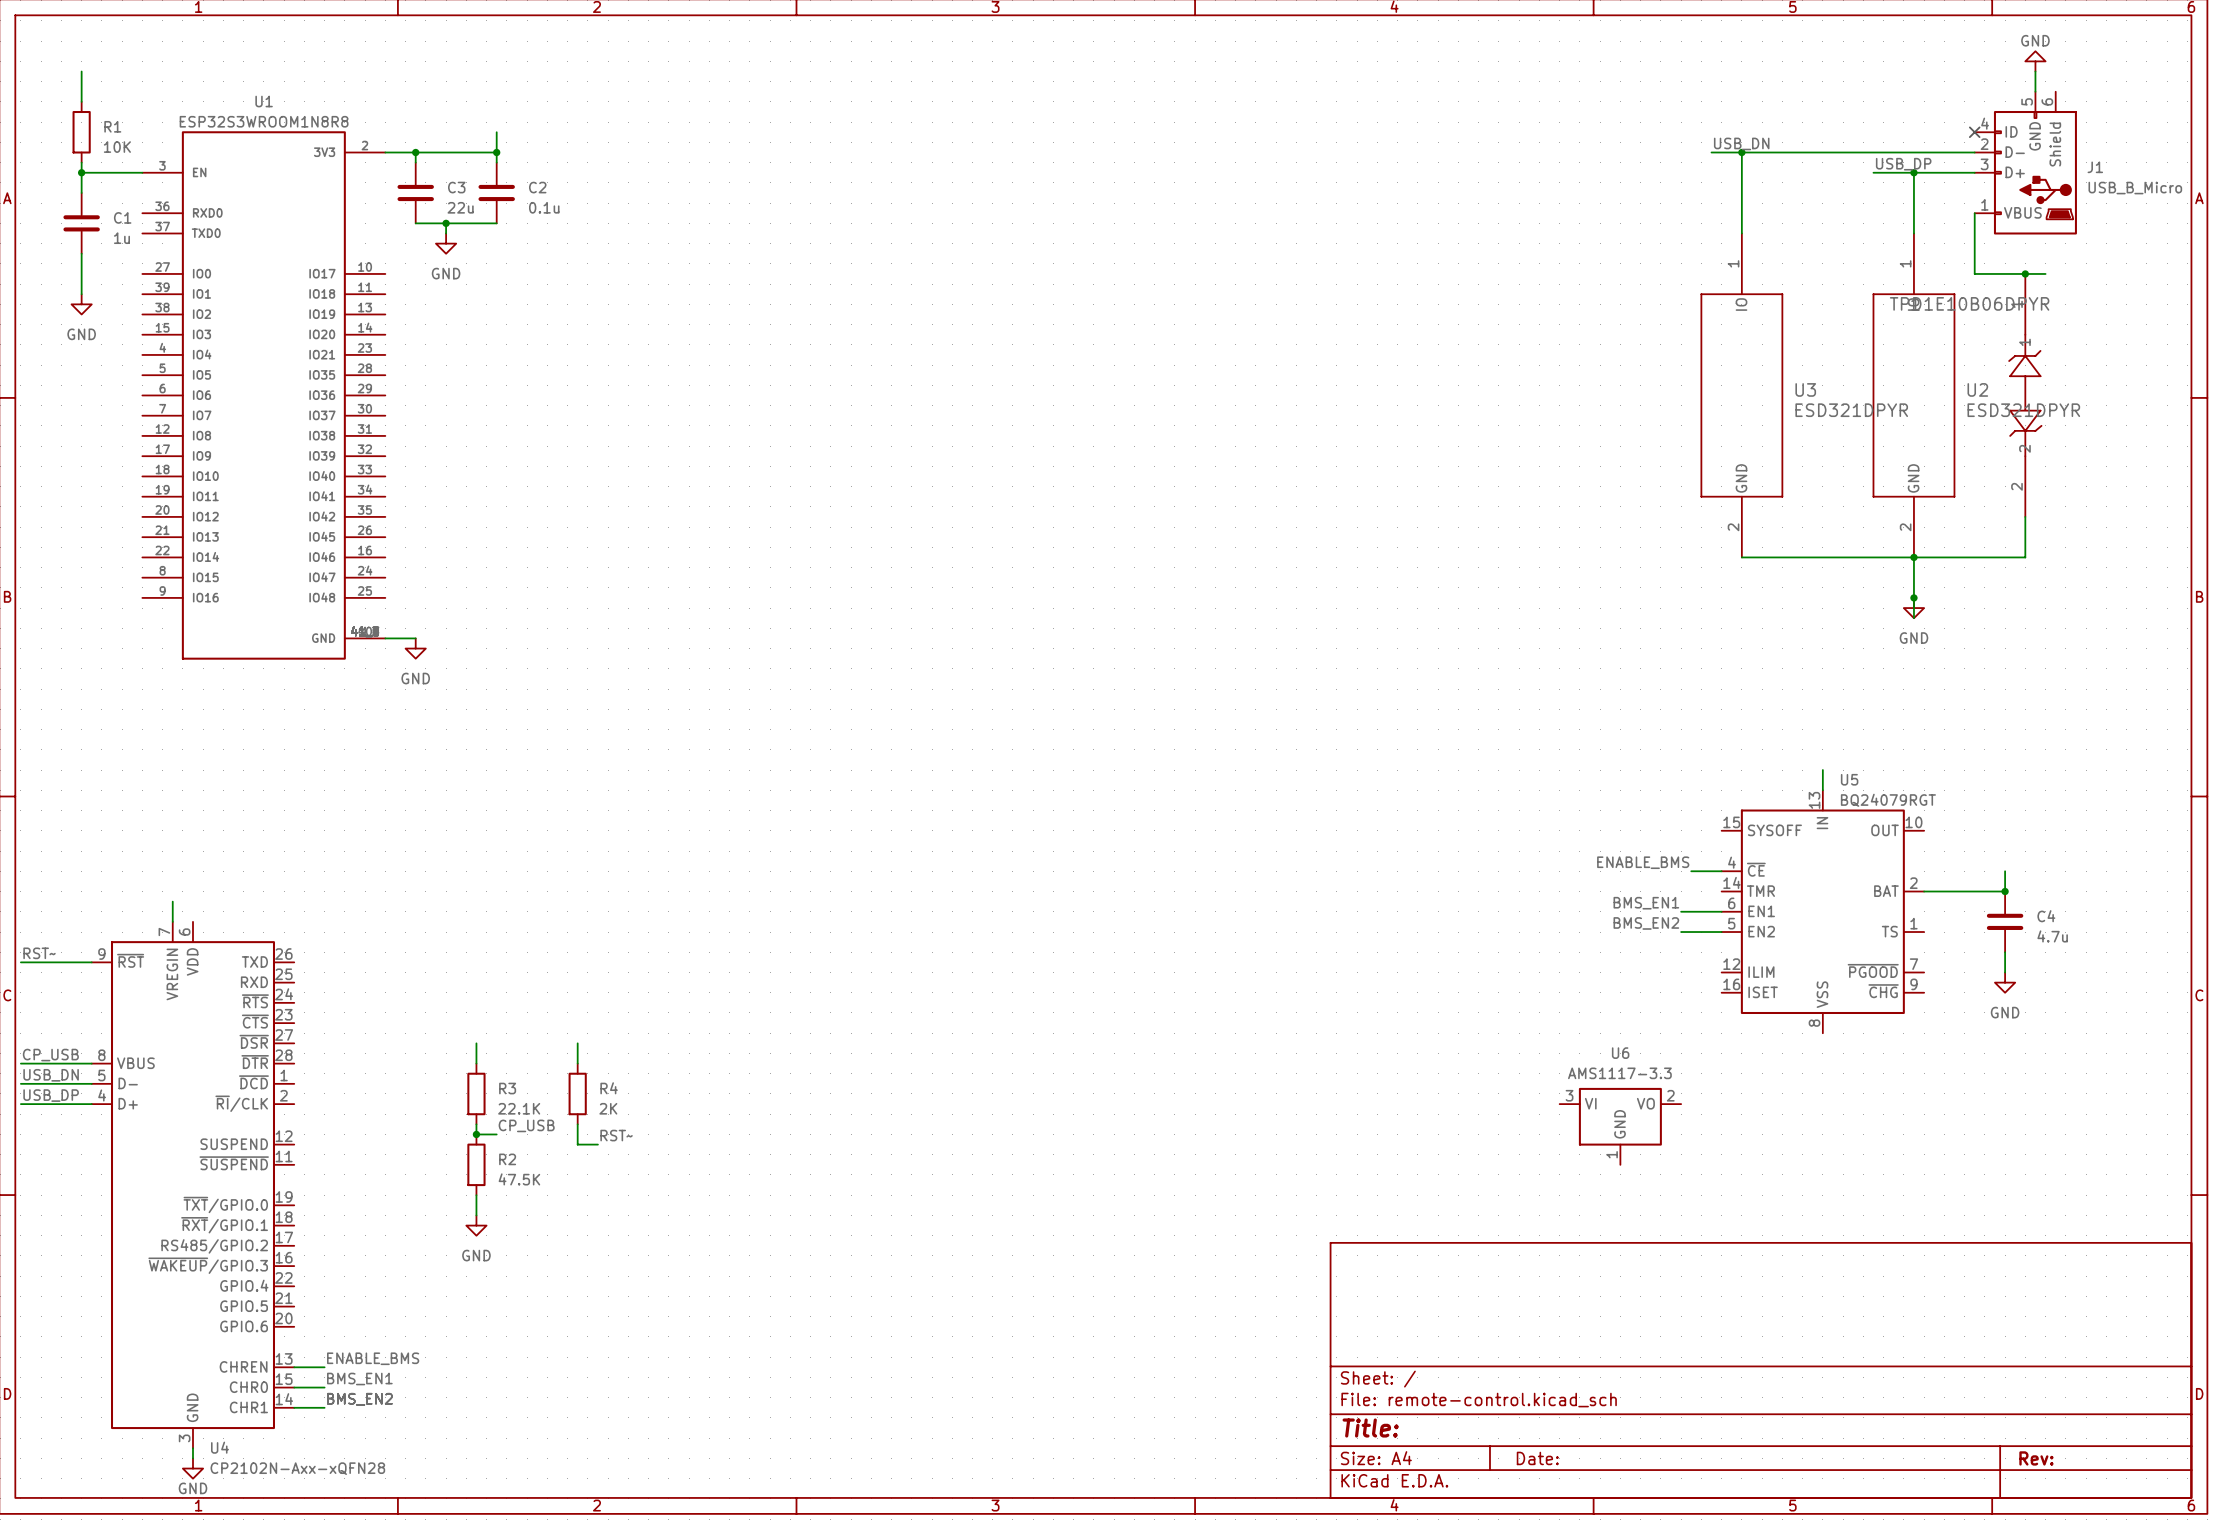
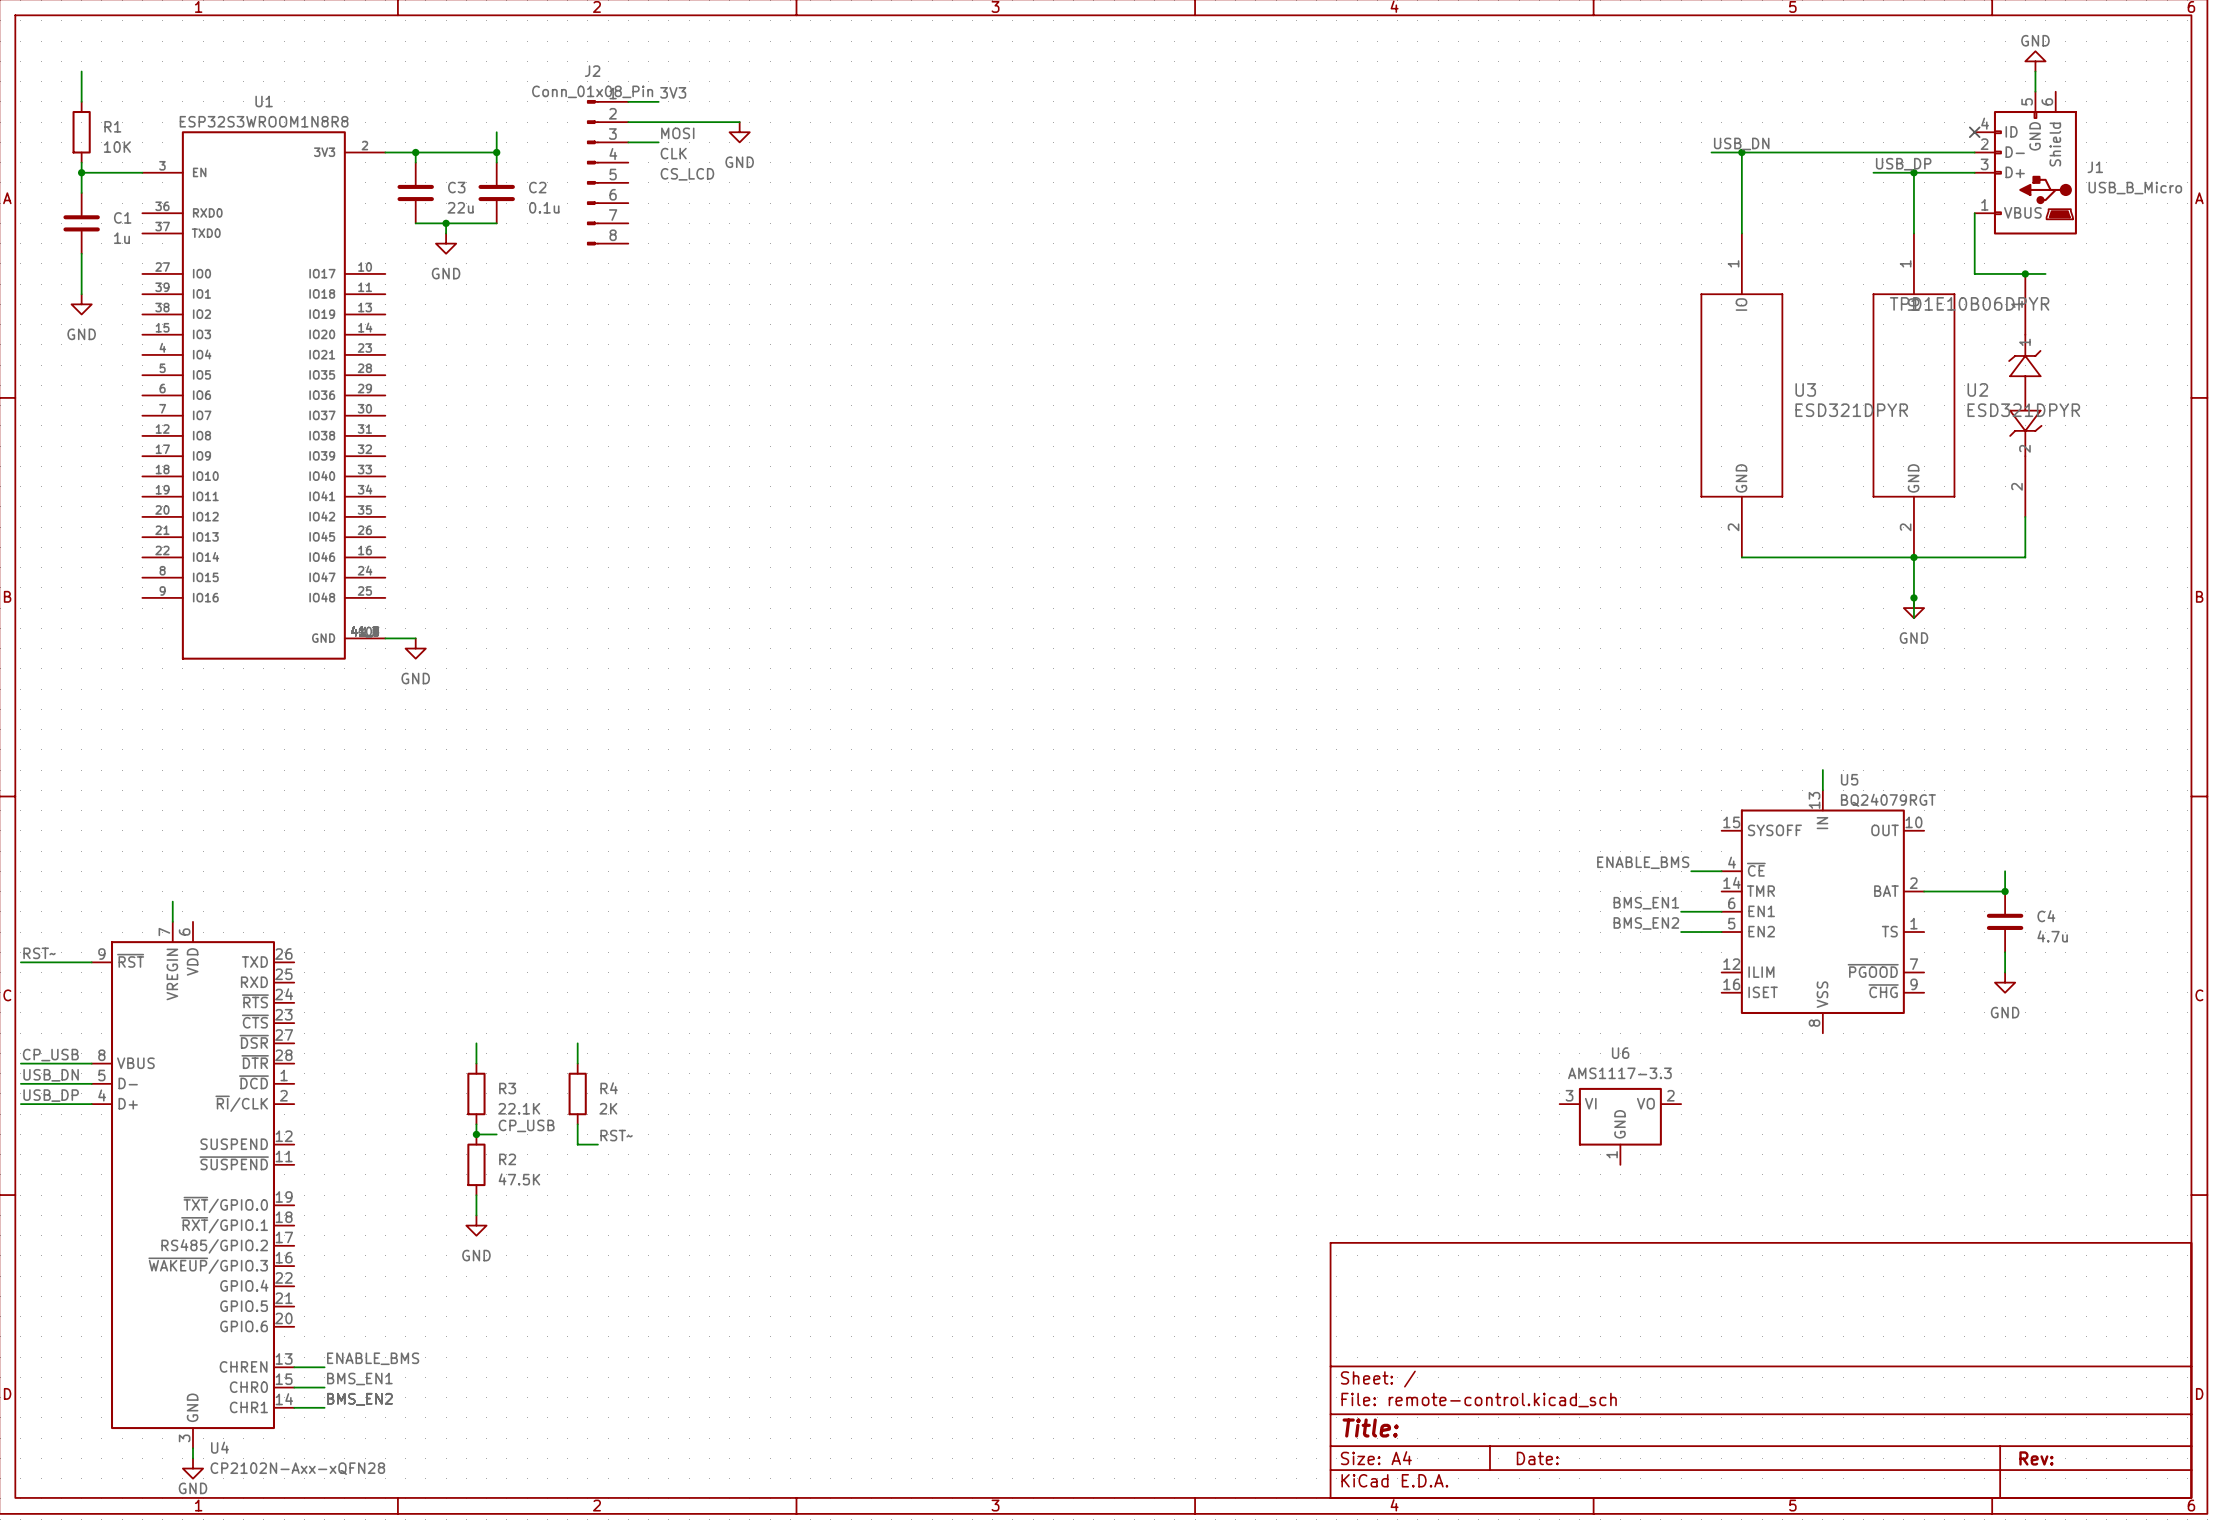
label: none -> 3V3 (673, 92)
wire: none -> (628, 101) (658, 101)
wire: none -> (628, 122) (739, 122)
power symbol: none -> GND (739, 132)
label: none -> MOSI (677, 133)
wire: none -> (628, 142) (658, 142)
label: none -> CLK (673, 153)
J2: none -> Conn_01x08_Pin (607, 172)
label: none -> CS_LCD (687, 174)

